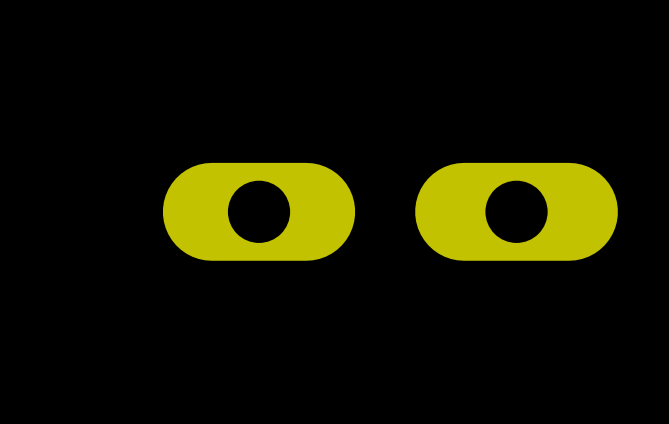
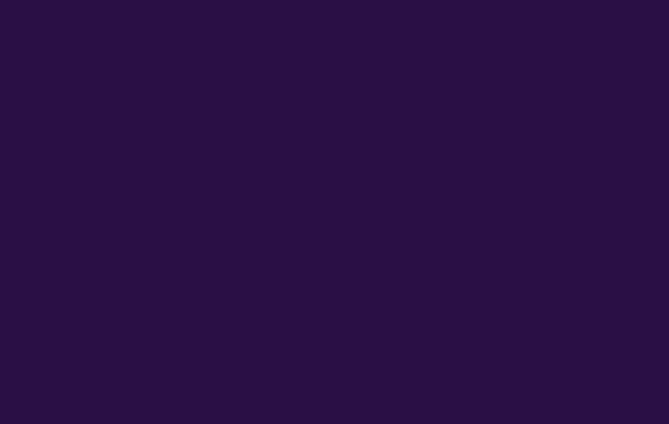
part: (390, 211) -> none

